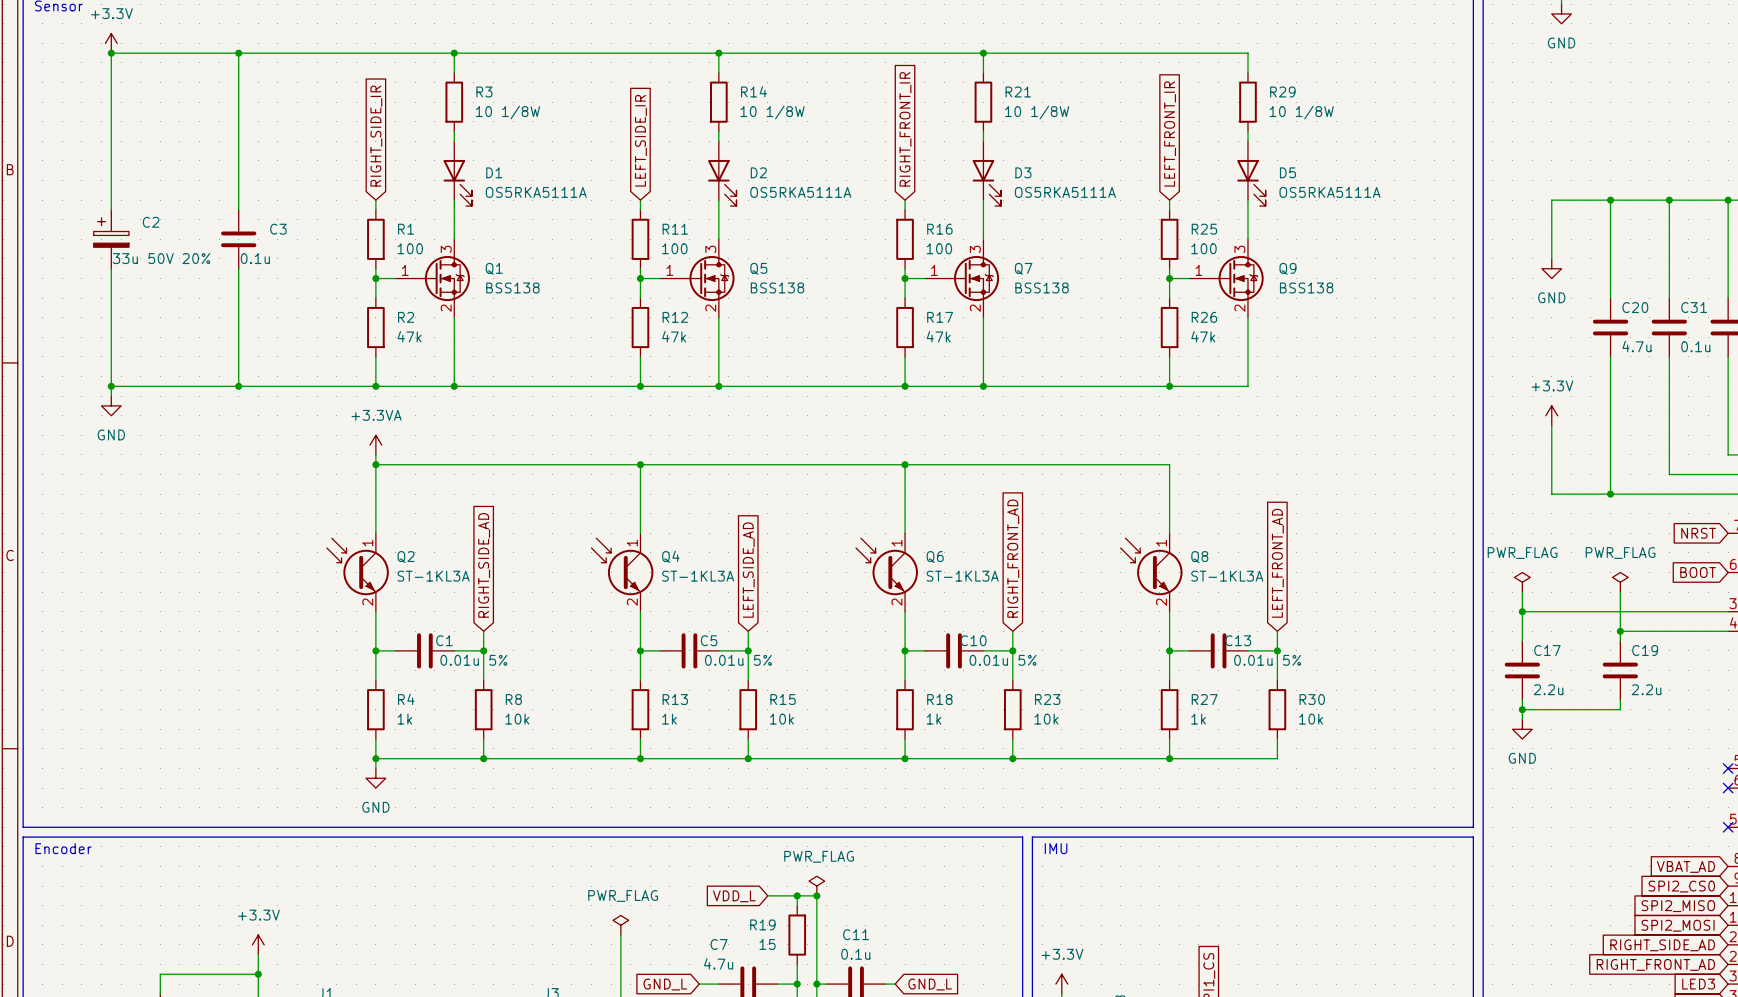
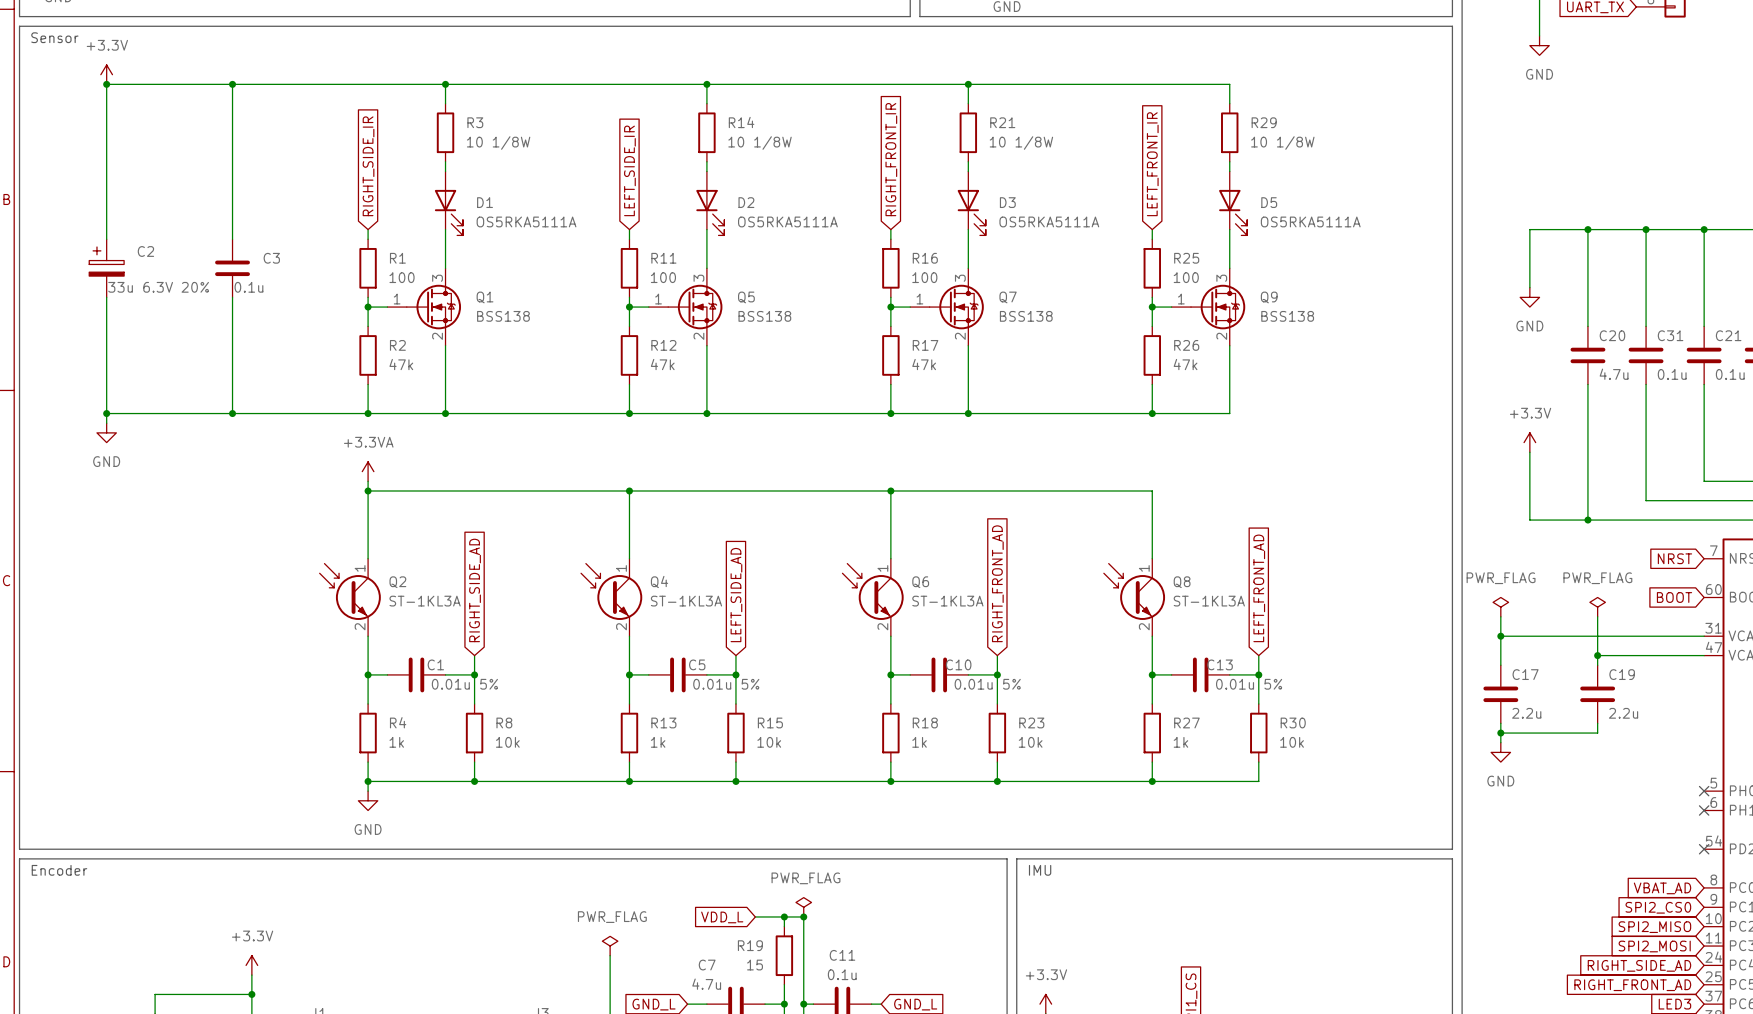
C2 value: 33u 50V 20% (161, 258) -> 33u 6.3V 20% (158, 287)

